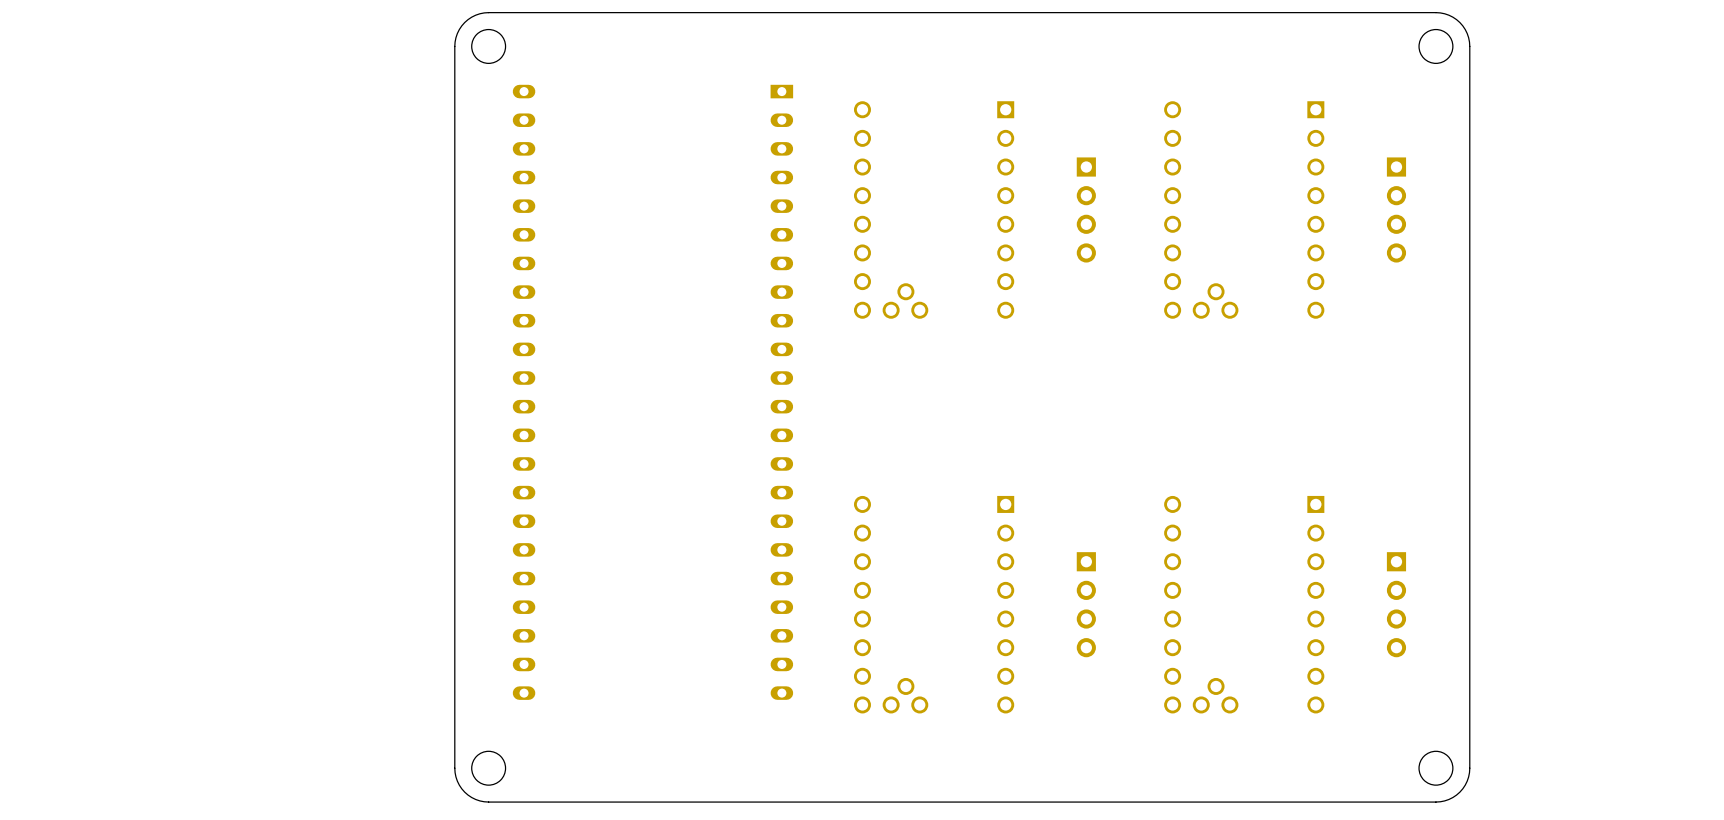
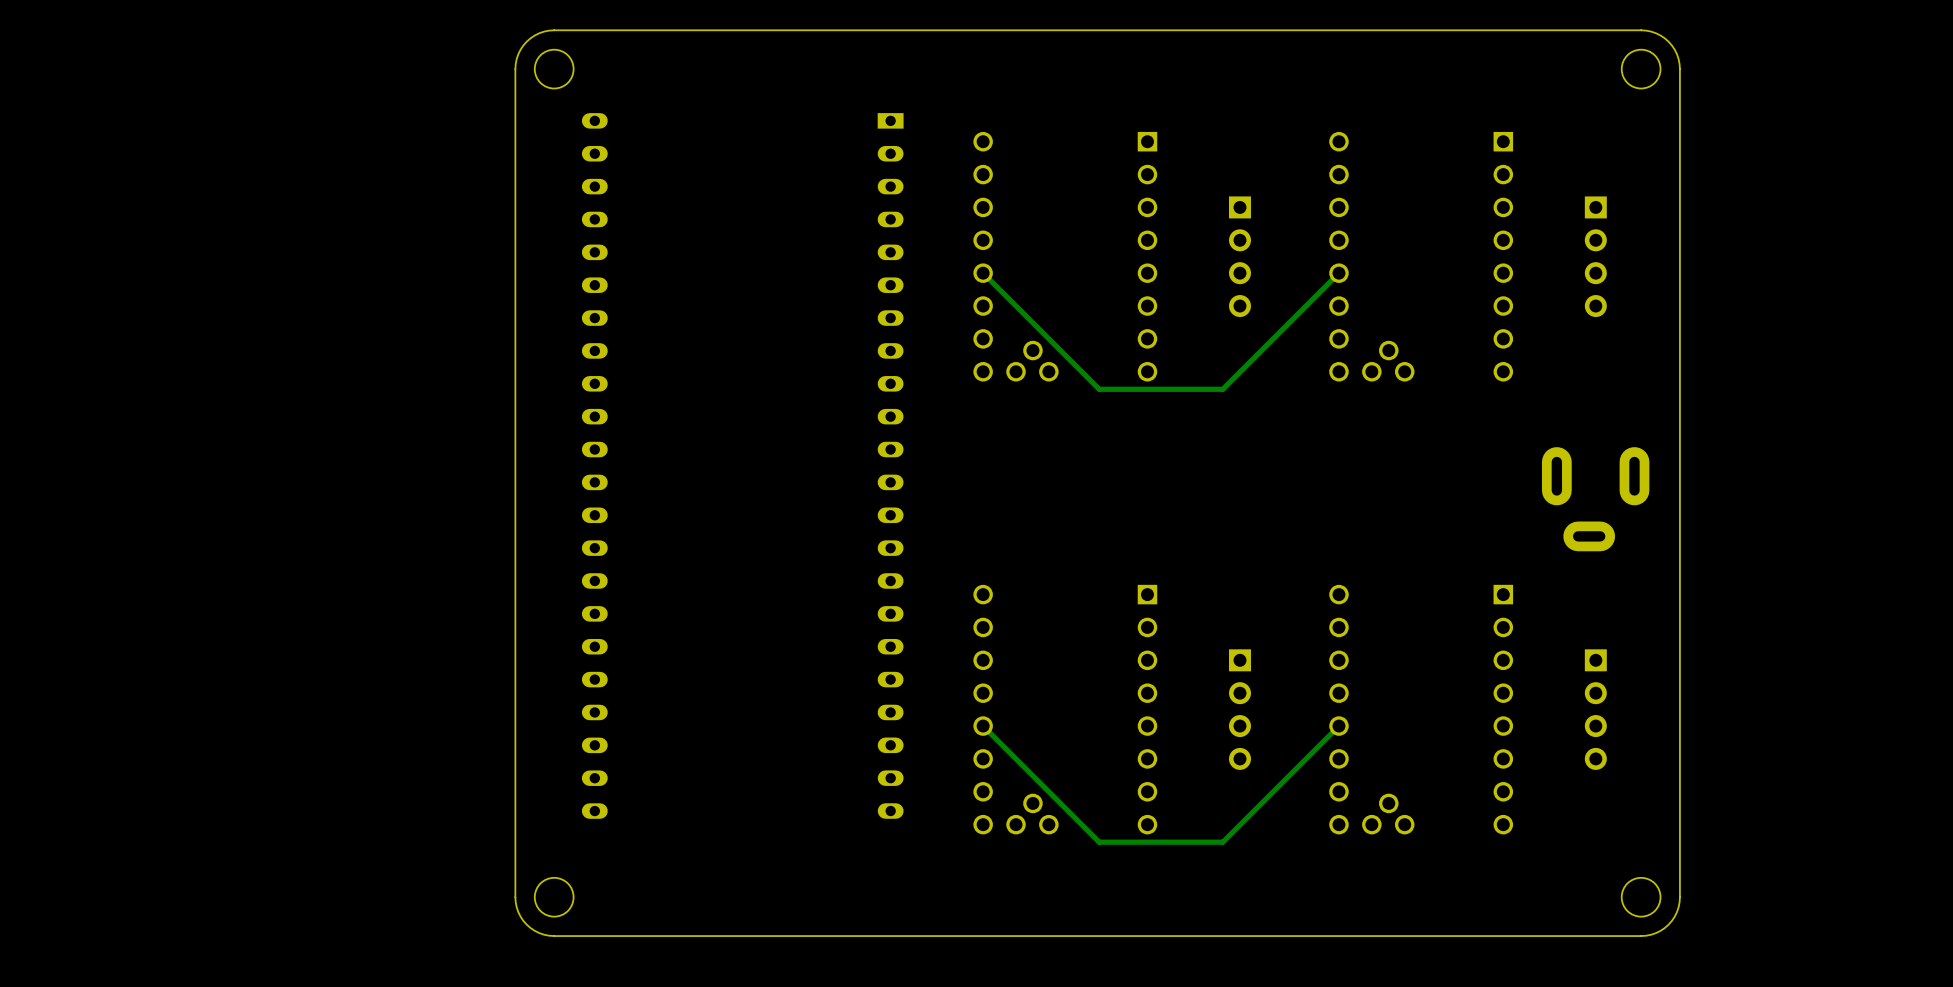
track: none -> (1338, 273) (1222, 389) (1099, 389) (983, 273)
part: none -> (1595, 499)
track: none -> (1338, 726) (1222, 842) (1099, 842) (983, 726)

